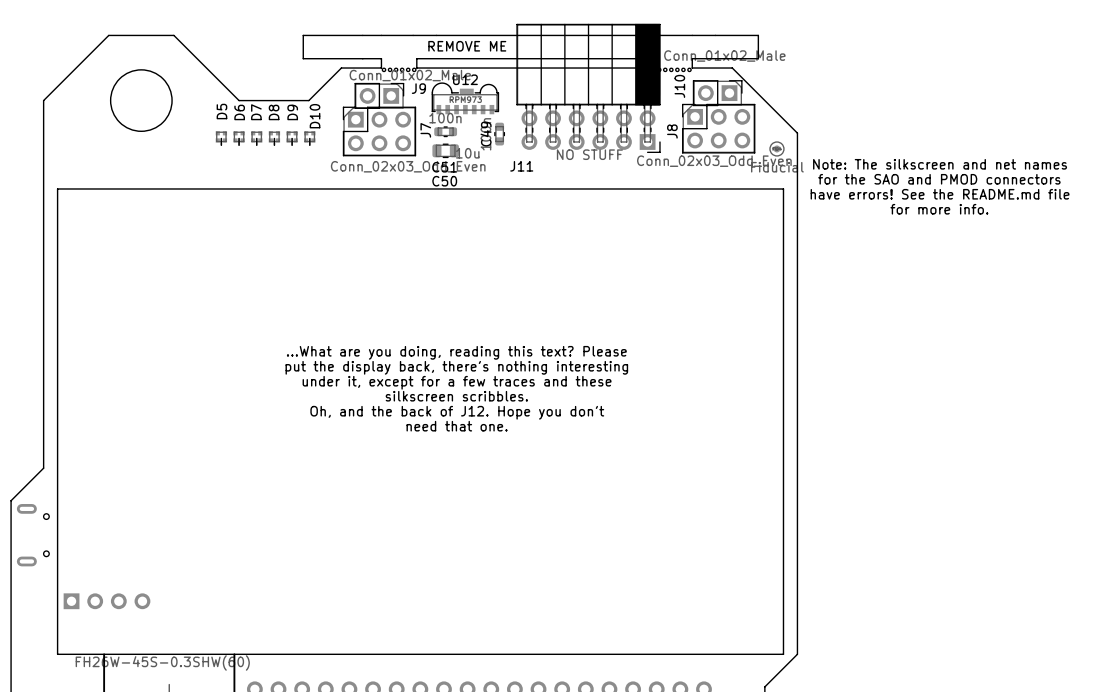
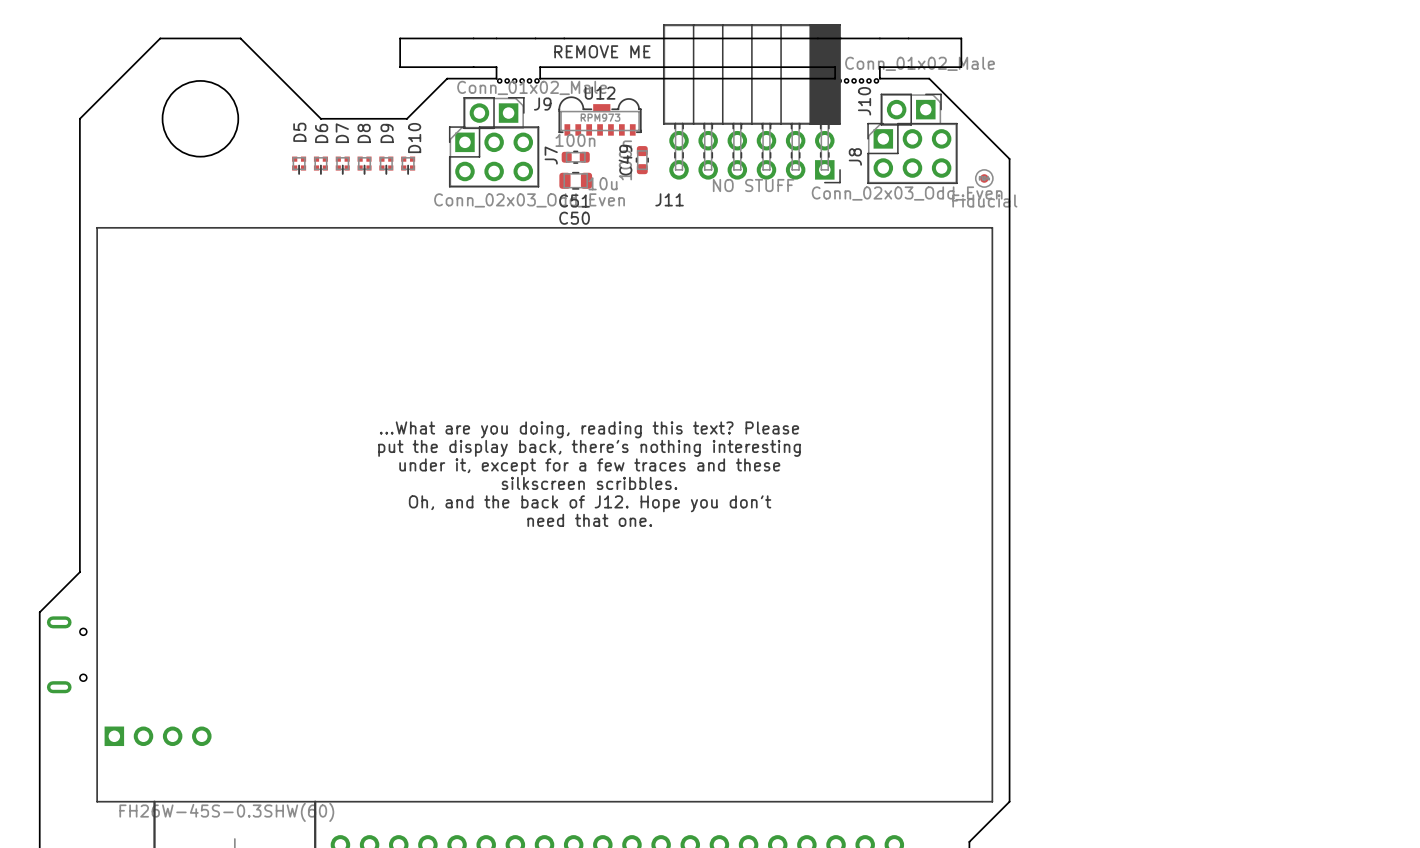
text: Note: The silkscreen and net names (940, 164) -> none
text: for the SAO and PMOD connectors (939, 179) -> none
text: have errors! See the README.md file (940, 194) -> none
text: for more info. (939, 209) -> none

